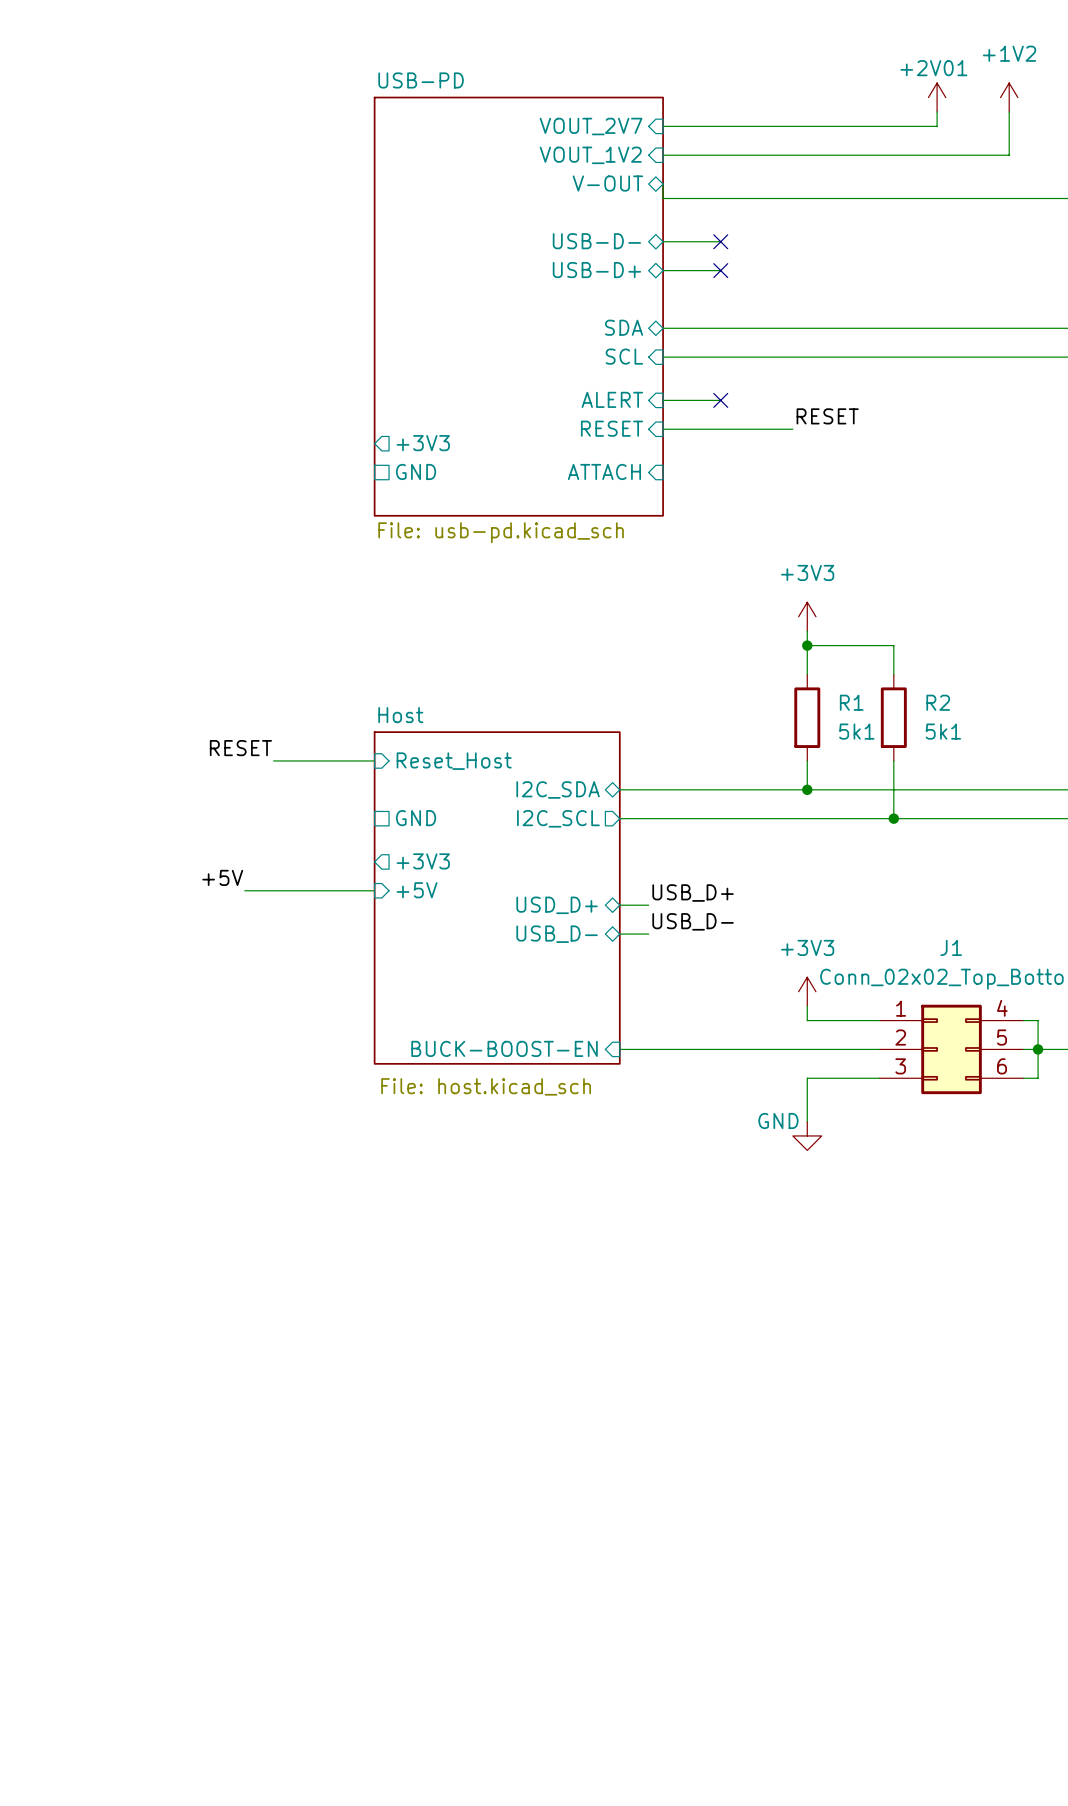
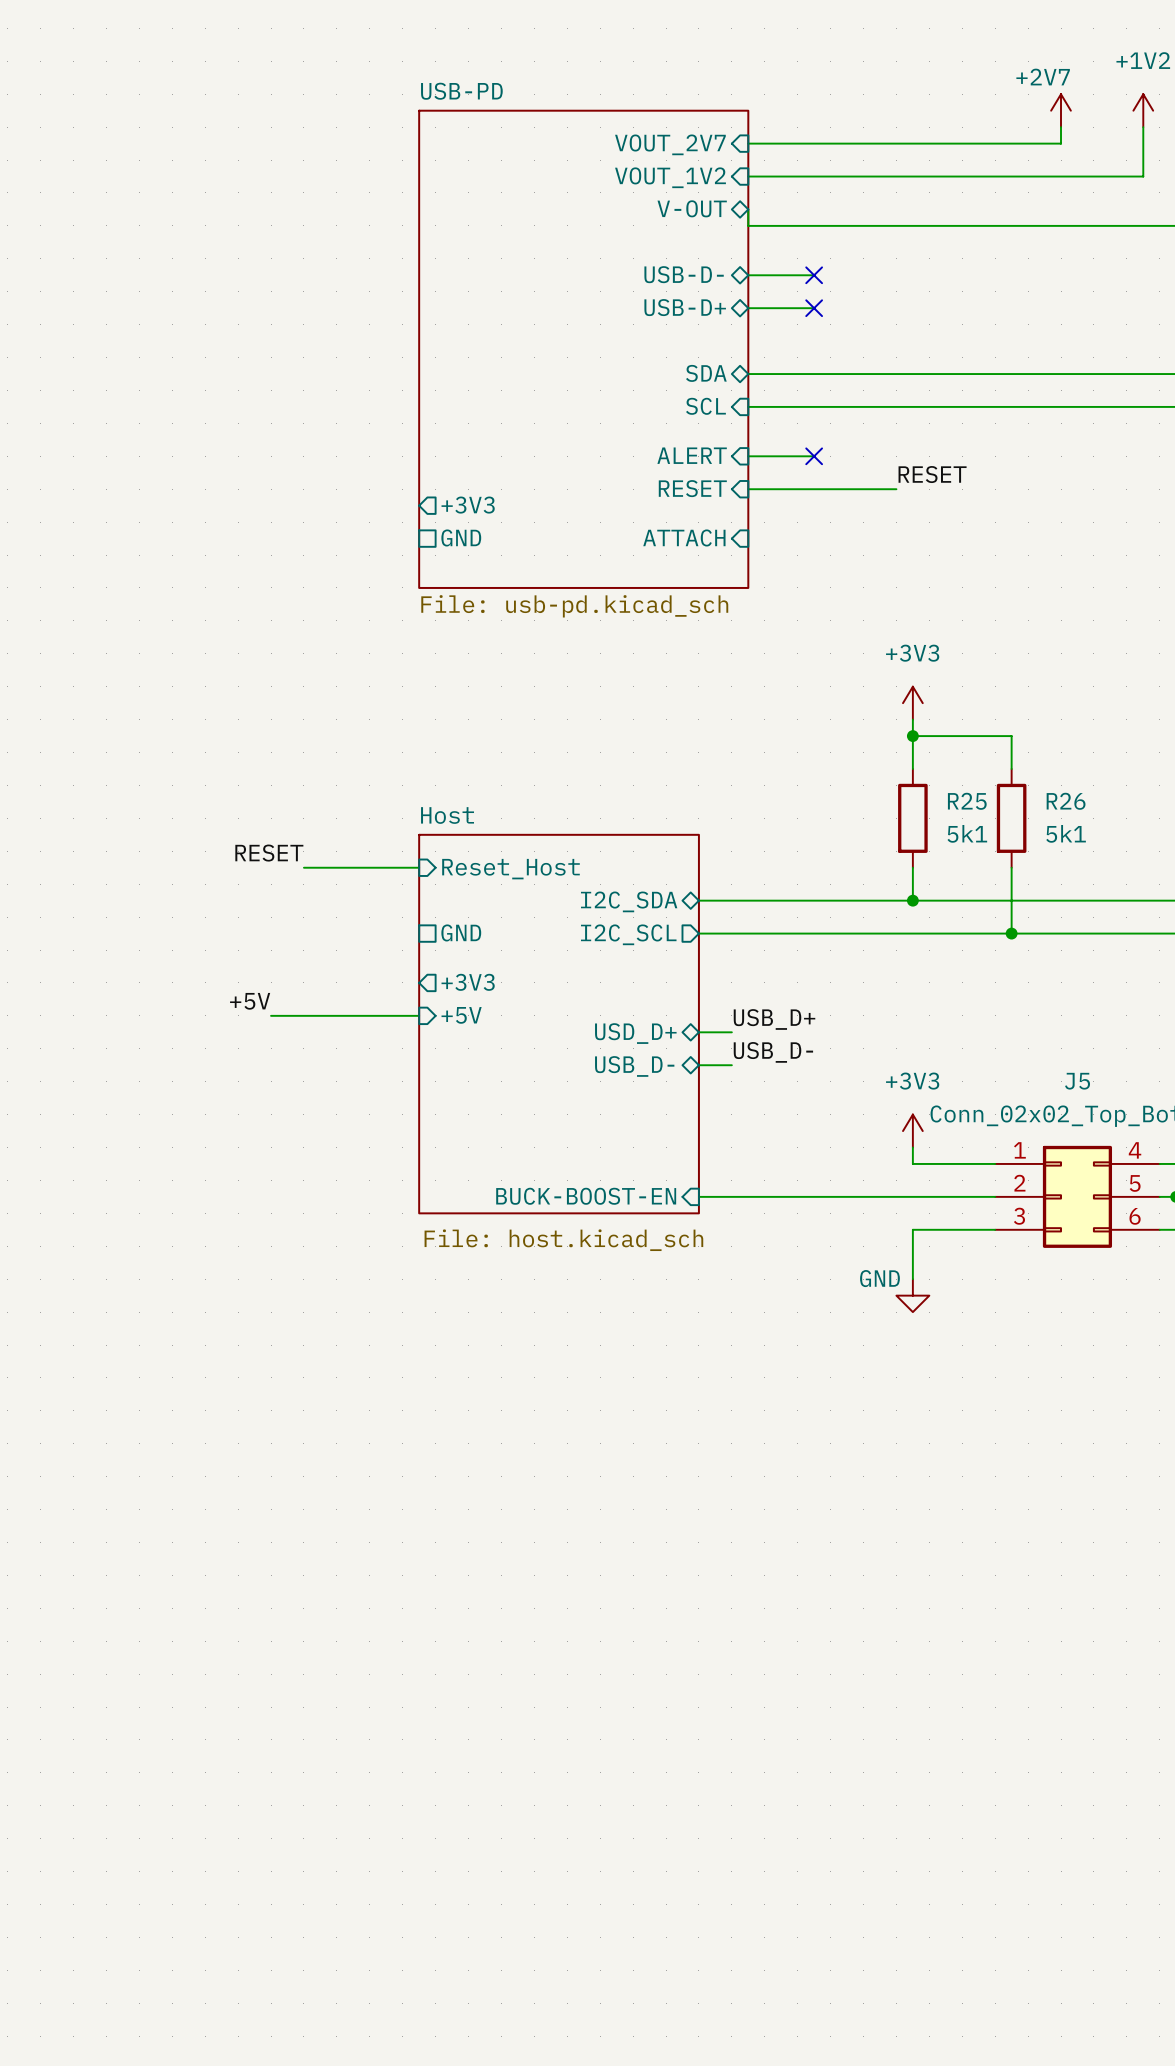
+2V01 name: +2V01 (933, 68) -> +2V7 (1043, 77)
R1 name: R1 (851, 702) -> R25 (967, 801)
R2 name: R2 (938, 702) -> R26 (1066, 801)
J1 name: J1 (951, 947) -> J5 (1077, 1081)

